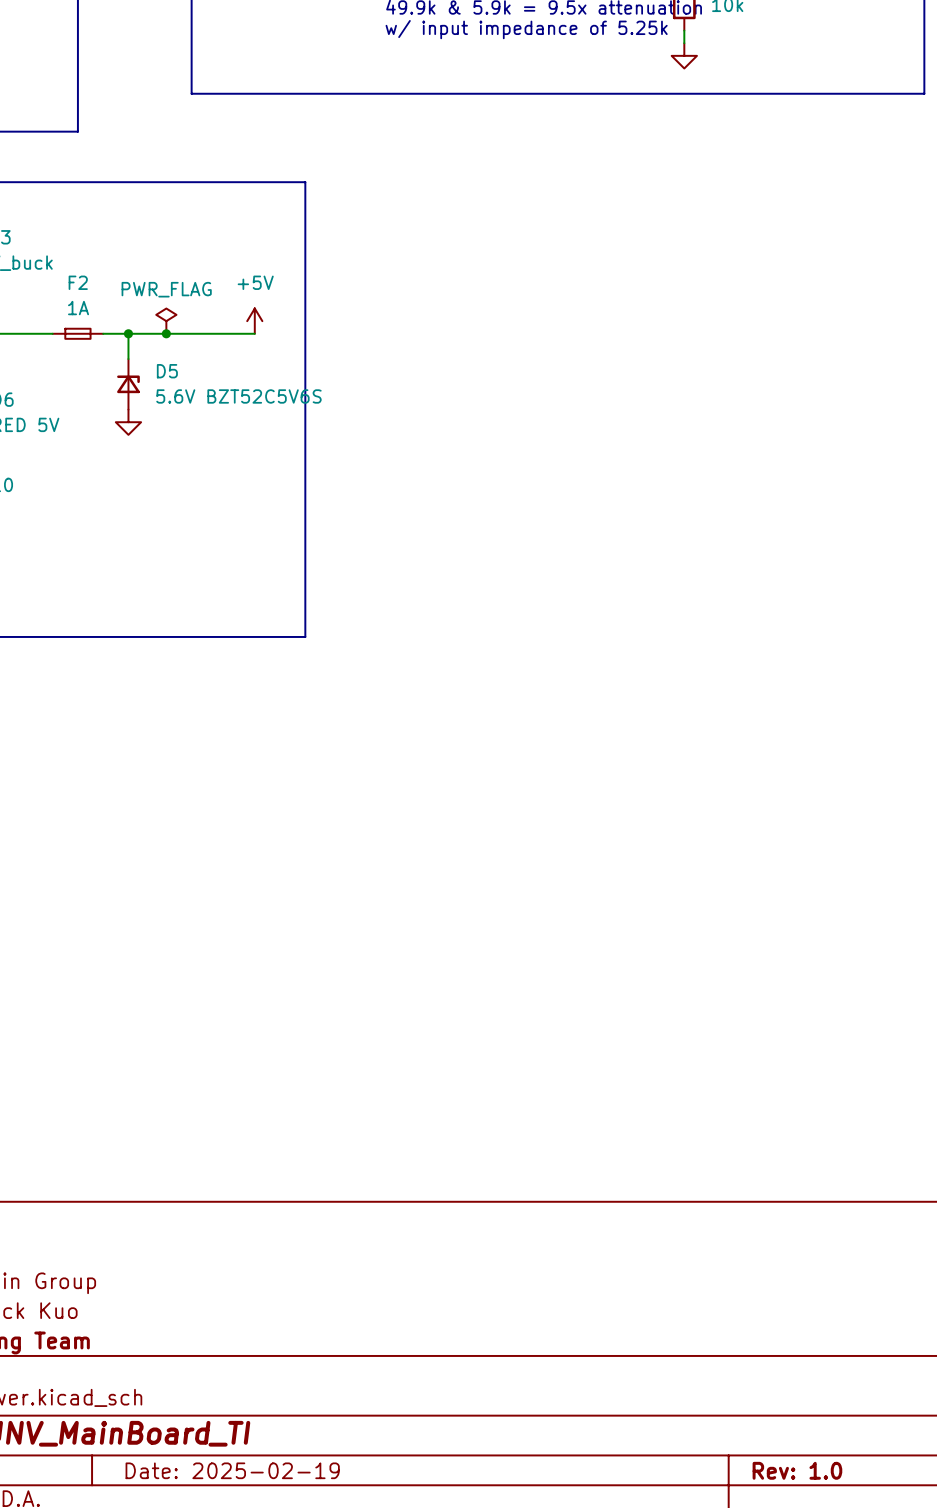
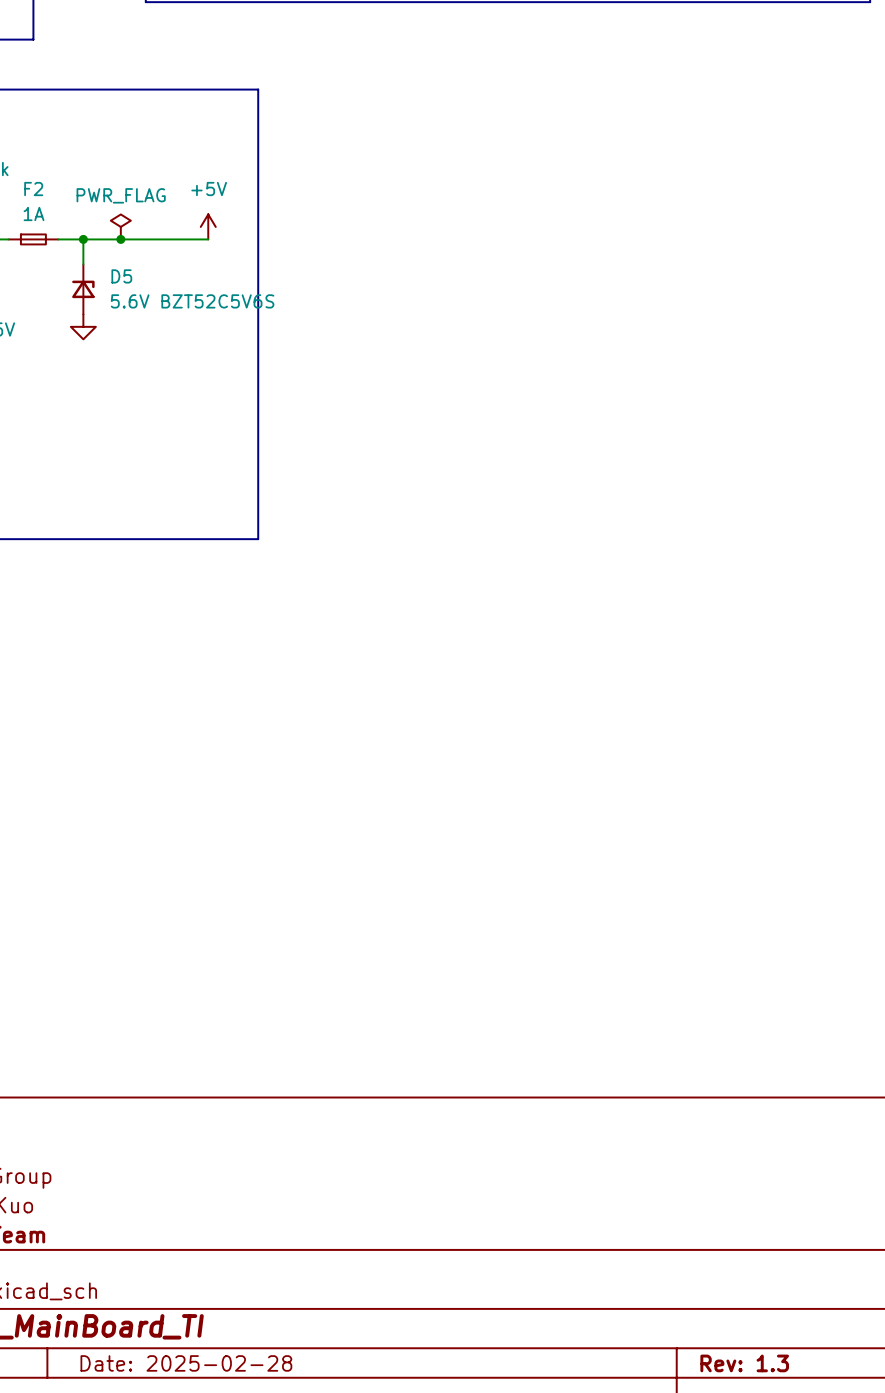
title block: Date: 2025-02-19 (232, 1470) -> Date: 2025-02-28 (186, 1363)
title block: Rev: 1.0 (797, 1470) -> Rev: 1.3 (744, 1363)

